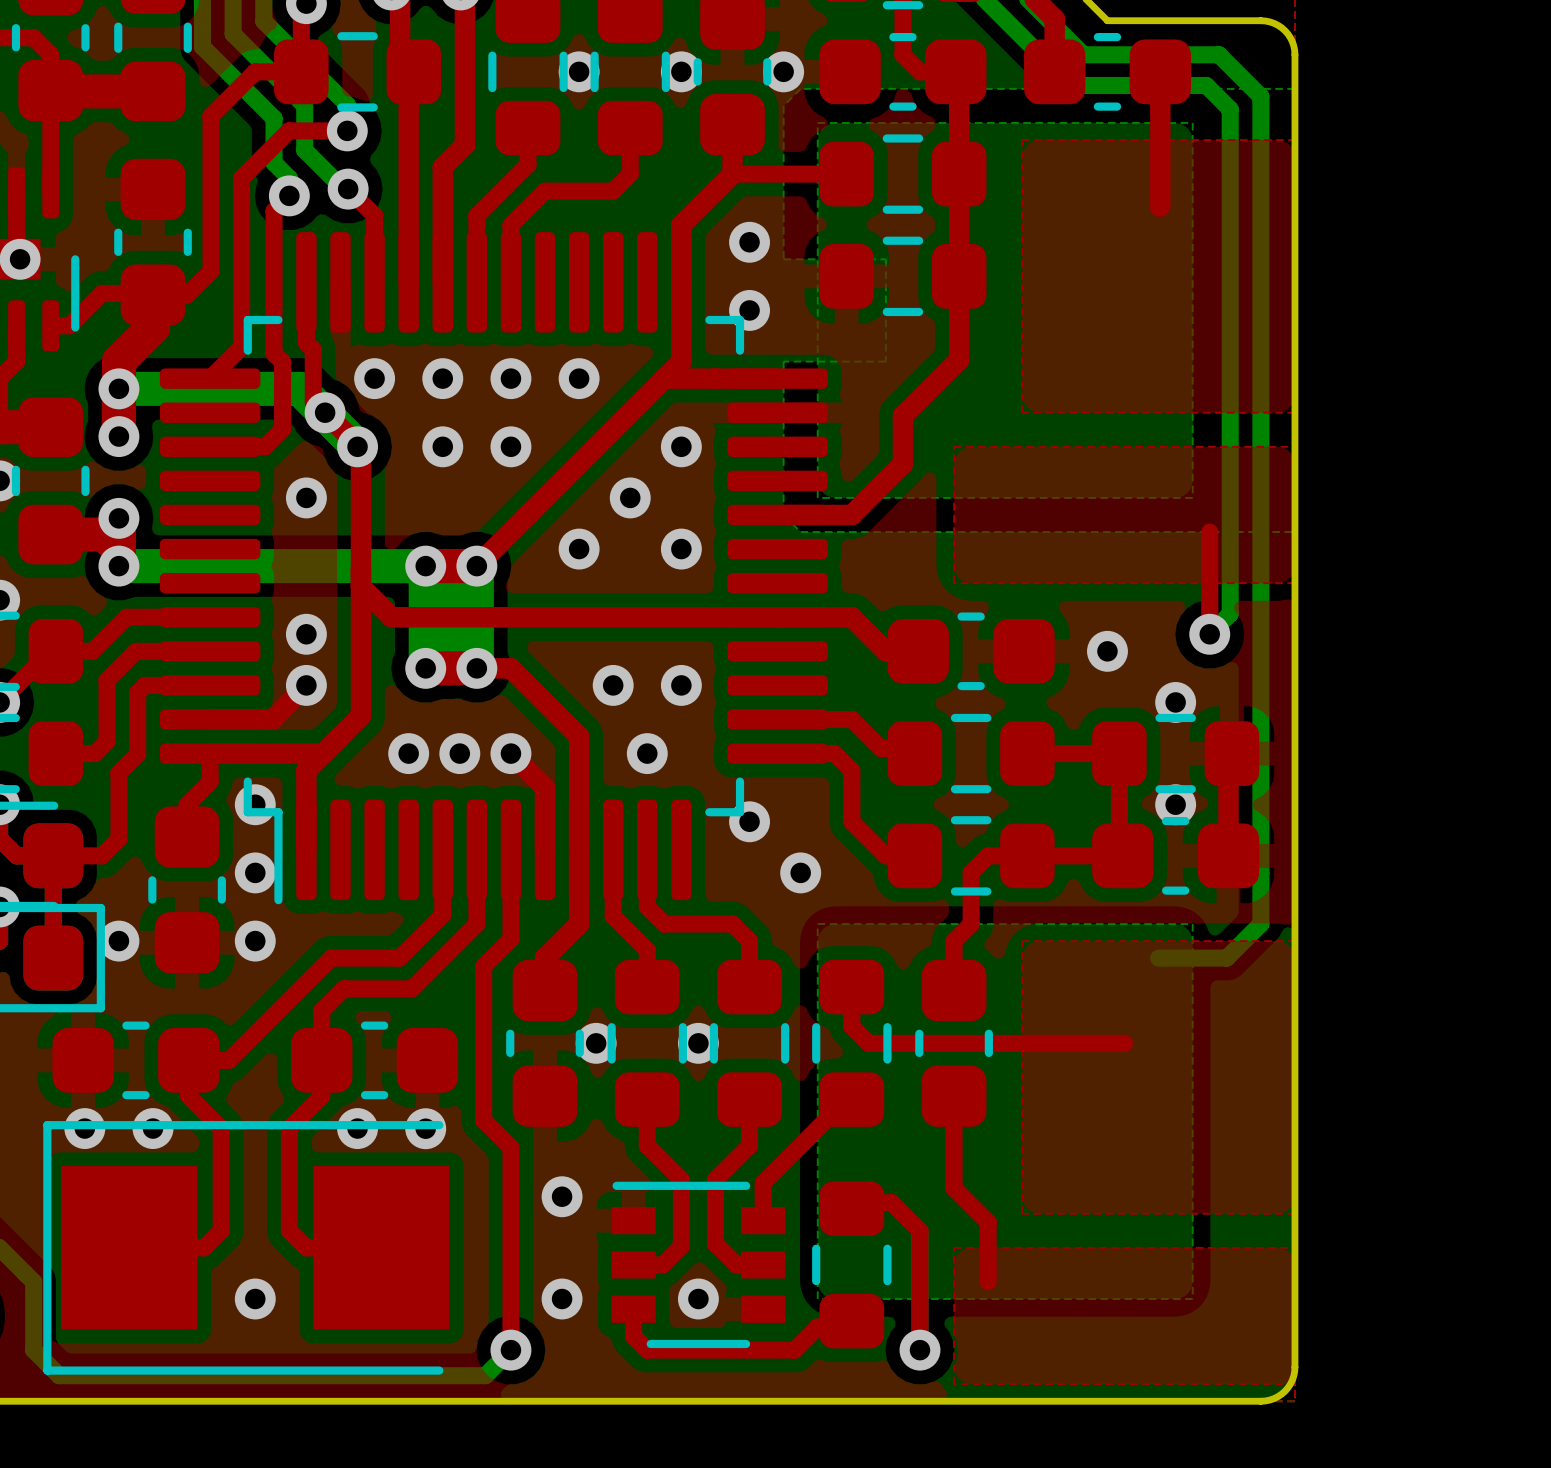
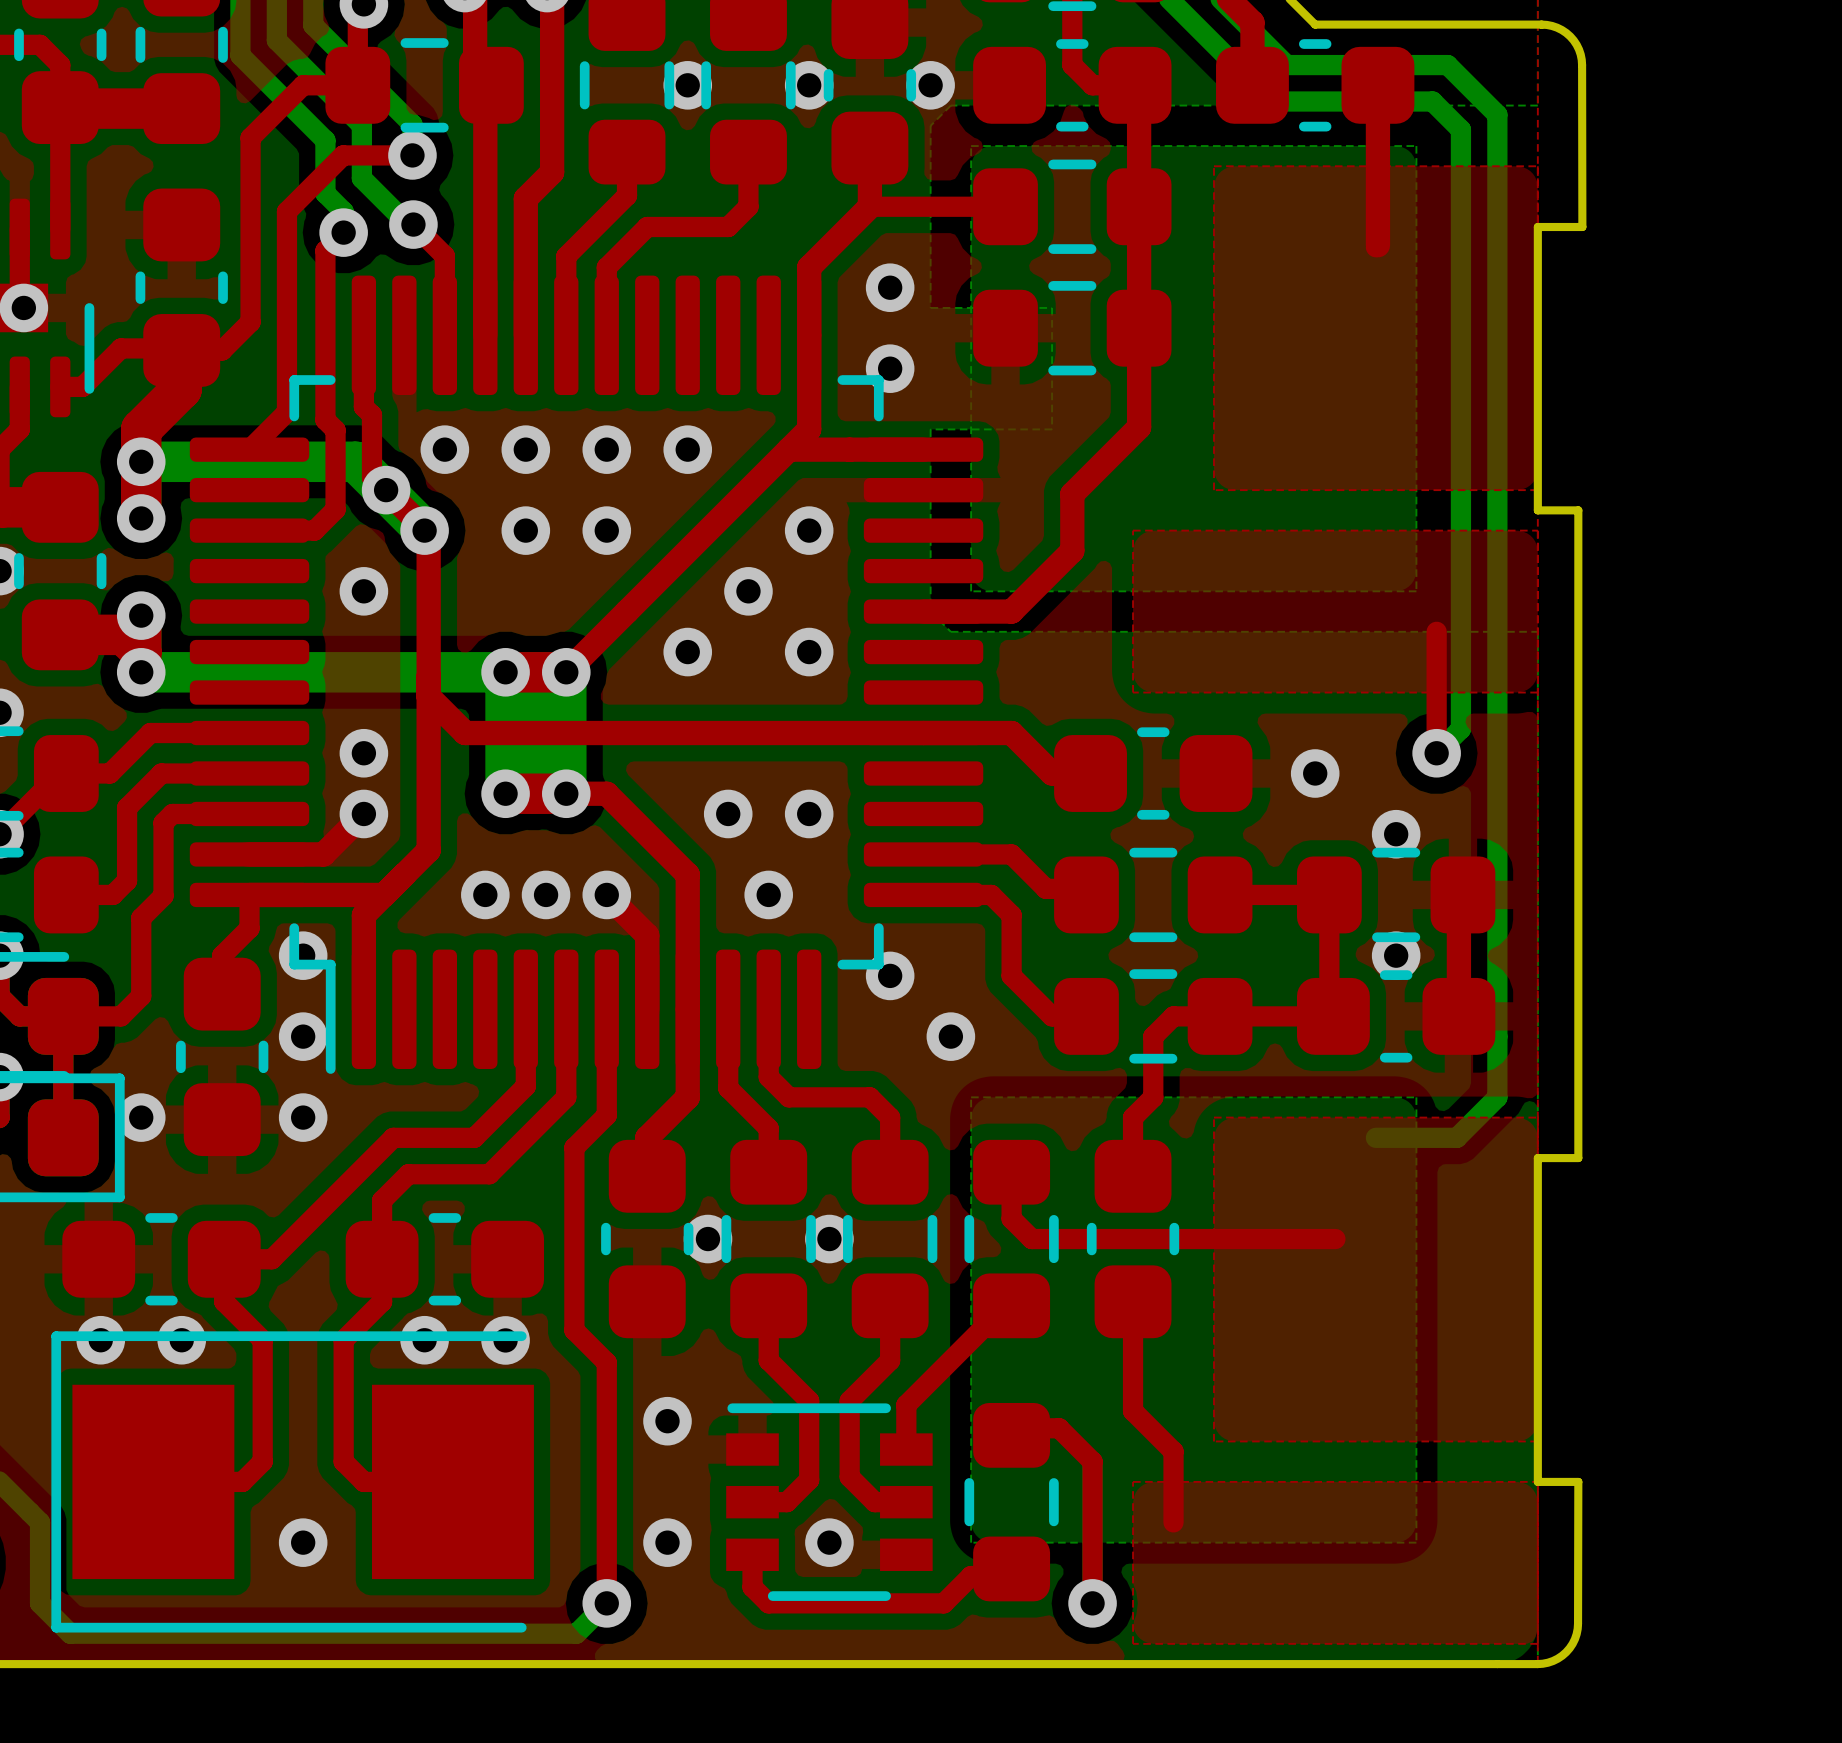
board edge: (1260, 20) (1269, 21) (1281, 27) (1290, 37) (1293, 45) (1294, 191) -> (1497, 24) (1541, 24) (1557, 27) (1570, 36) (1580, 54) (1582, 227) (1537, 227)
board edge: (1294, 429) (1294, 975) -> (1537, 510) (1578, 510) (1578, 1158) (1537, 1158)
board edge: (1294, 1247) (1293, 1375) (1287, 1387) (1281, 1394) (1269, 1400) (1260, 1401) -> (1537, 1481) (1578, 1481) (1576, 1634) (1566, 1652) (1553, 1661) (1537, 1664) (1497, 1664)

